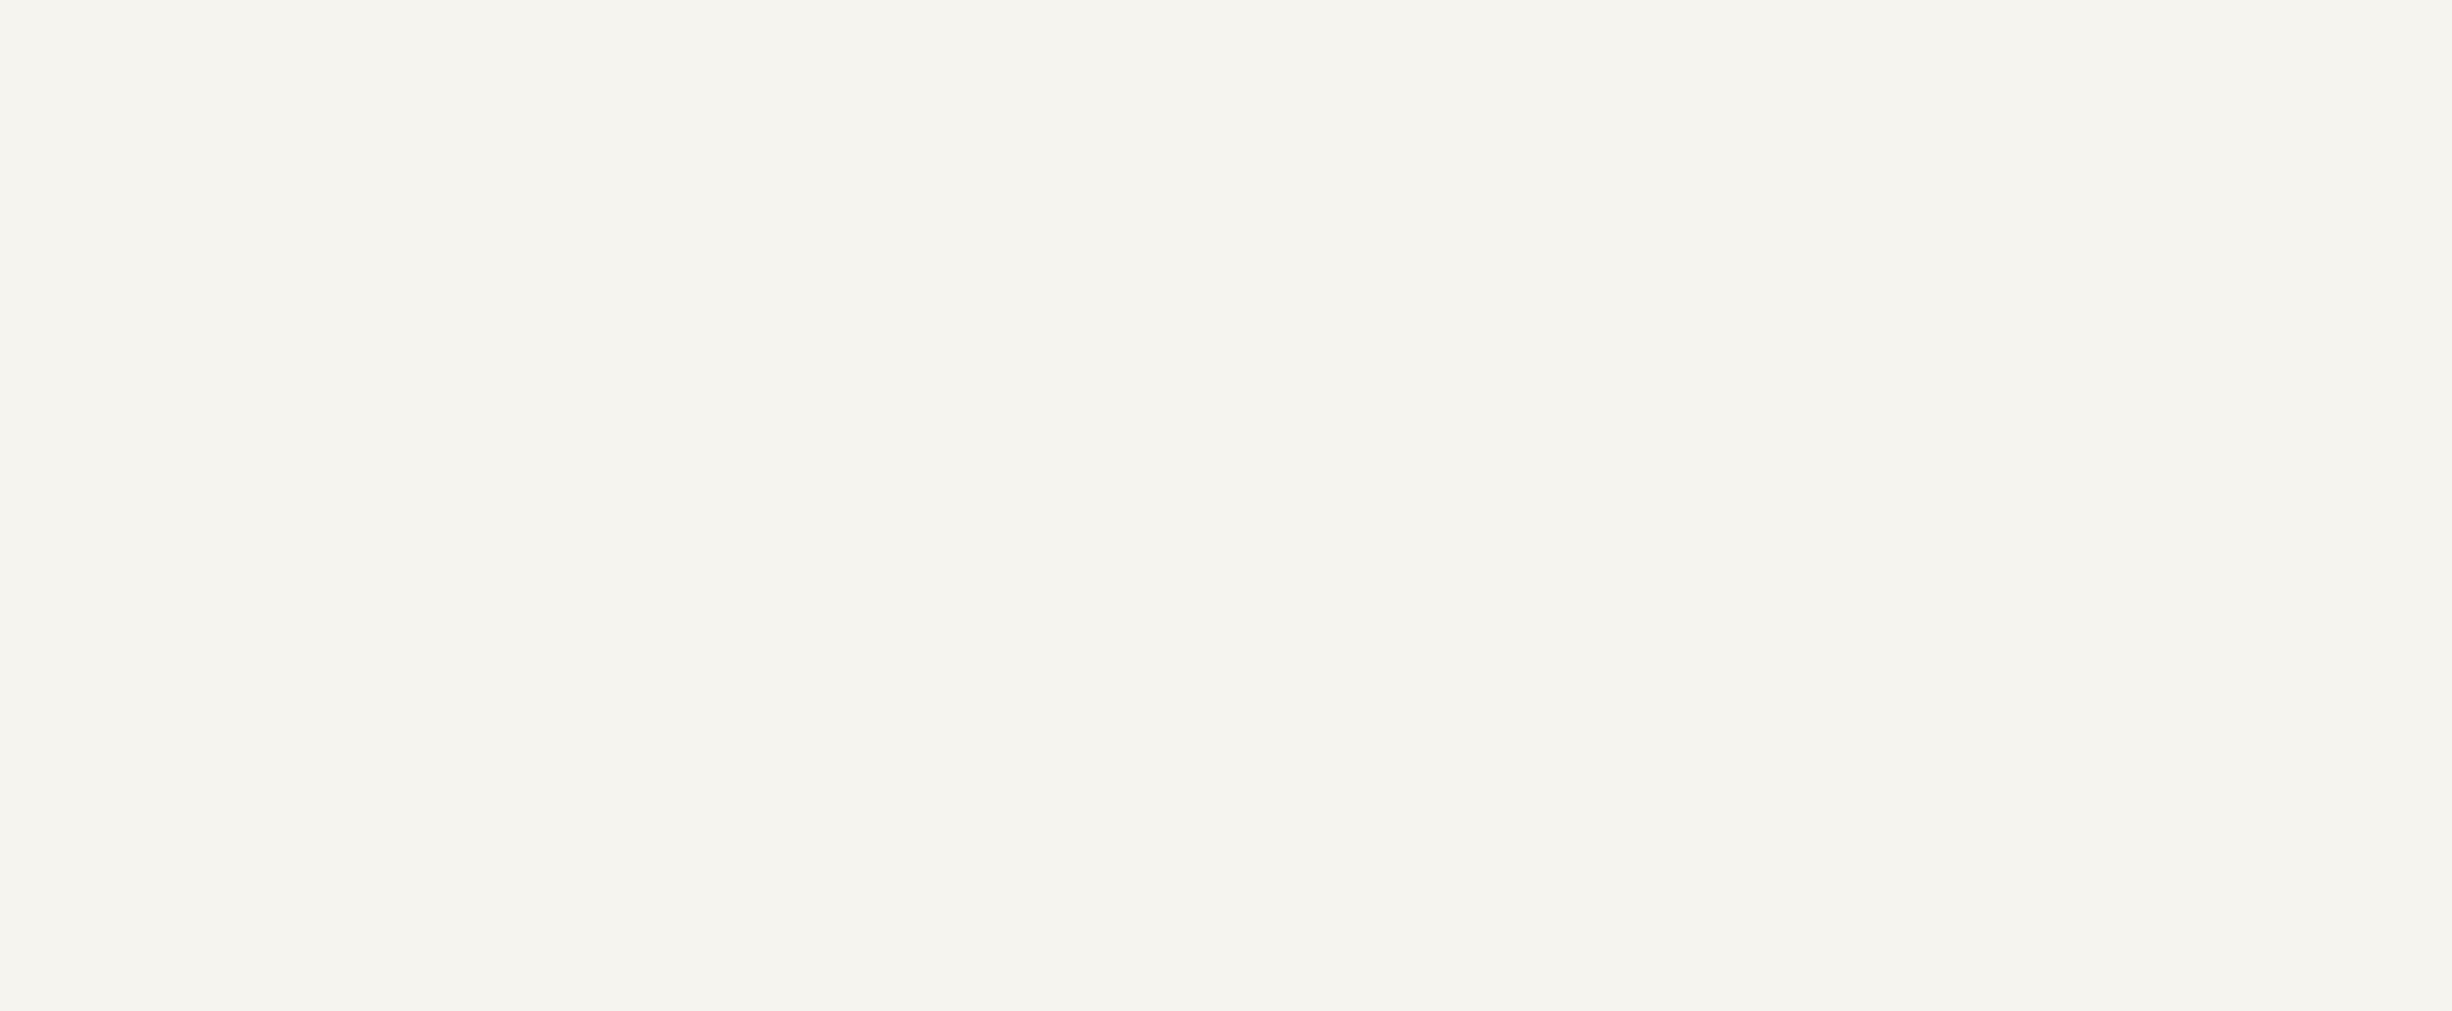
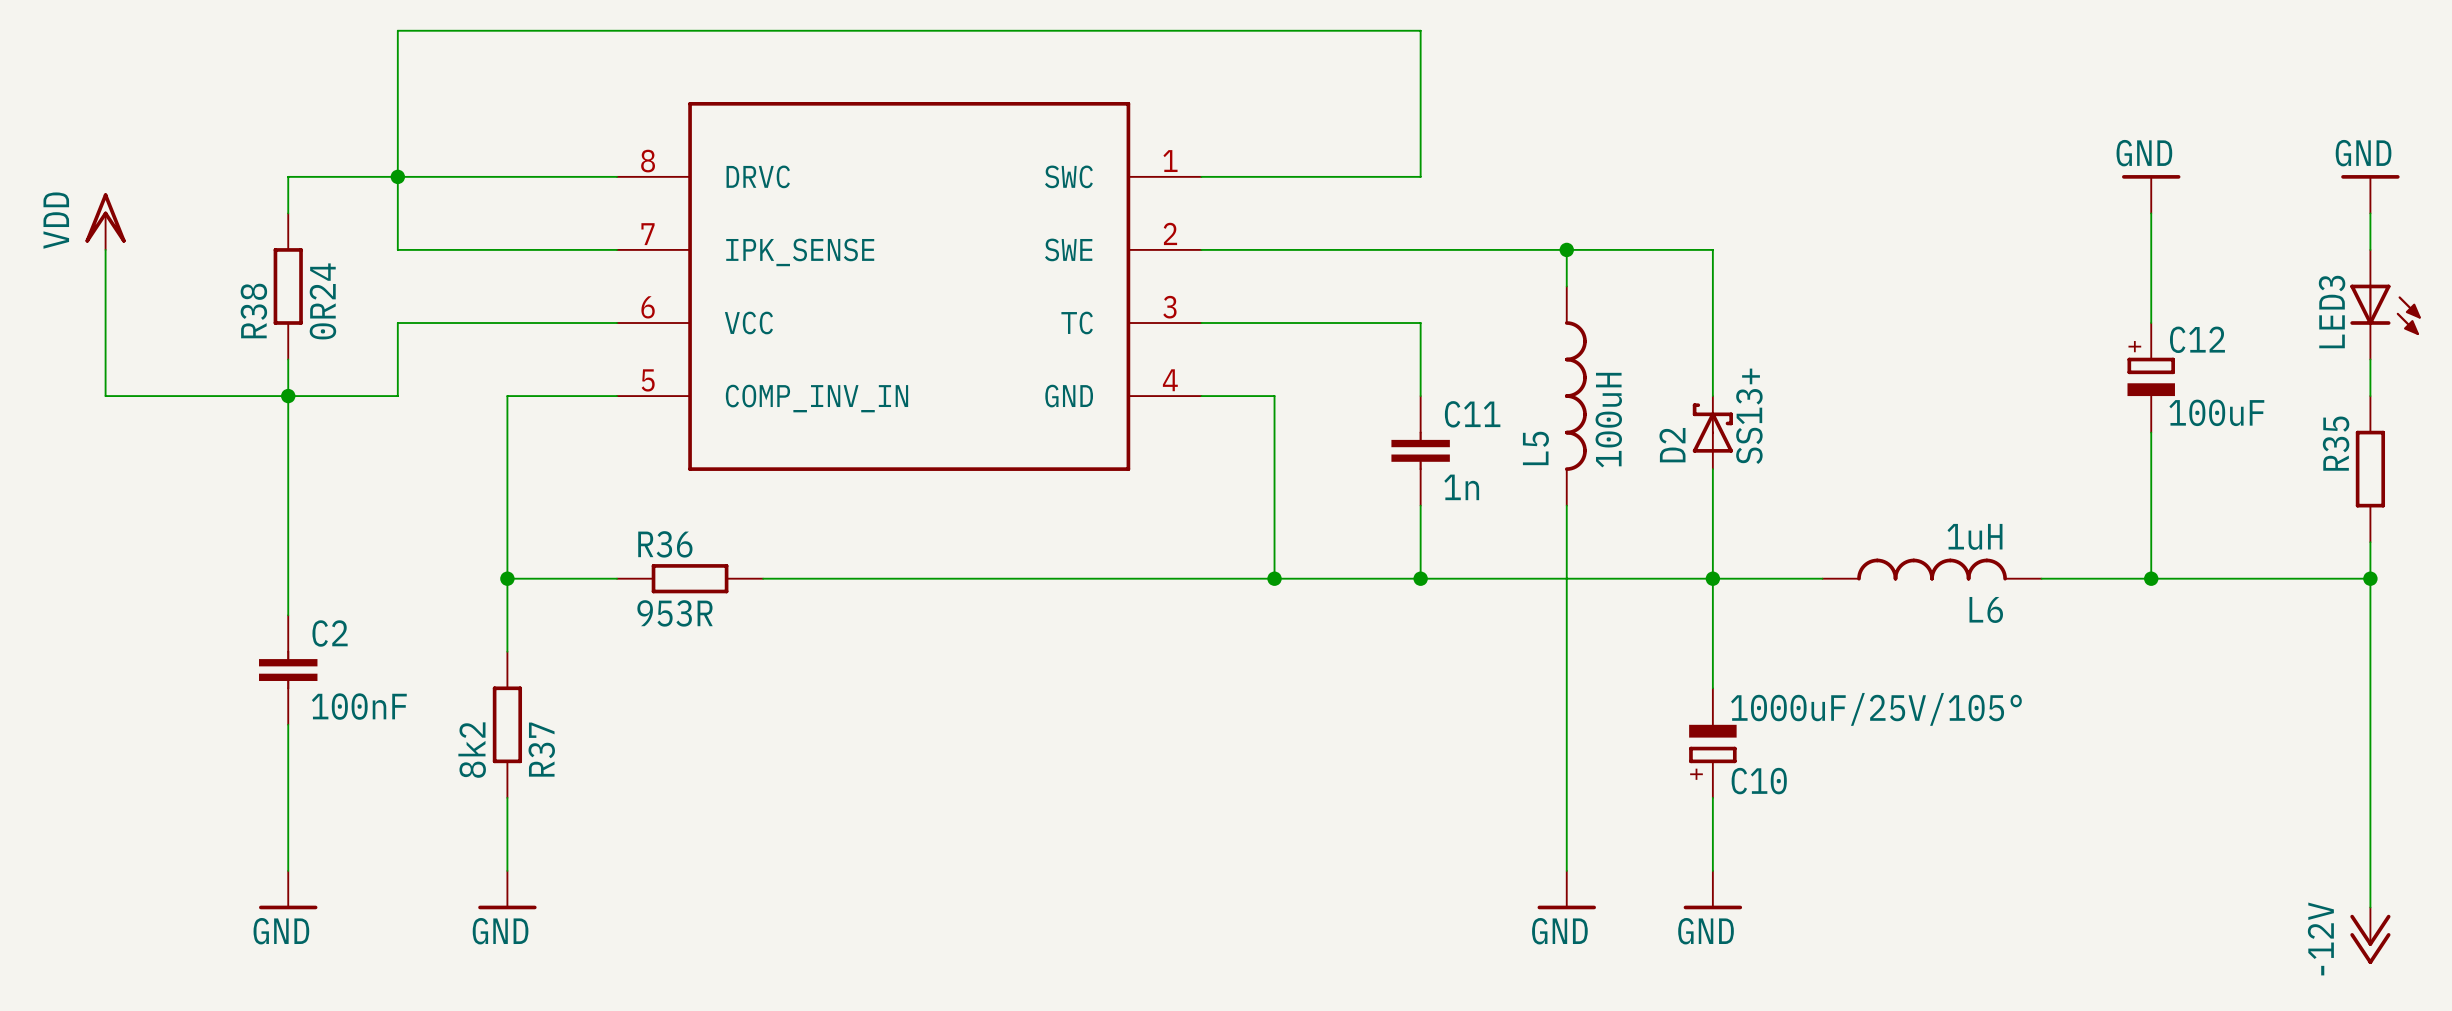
junction: none -> (397, 176)
wire: none -> (617, 176) (288, 176) (288, 213)
wire: none -> (1201, 176) (1420, 176) (1420, 30) (397, 30) (397, 249) (617, 249)
power symbol: none -> GND (2151, 194)
power symbol: none -> GND (2370, 194)
wire: none -> (2151, 213) (2151, 323)
wire: none -> (2370, 213) (2370, 249)
power symbol: none -> VDD (105, 221)
wire: none -> (105, 249) (105, 396) (397, 396) (397, 323) (617, 323)
wire: none -> (1201, 249) (1712, 249) (1712, 396)
wire: none -> (1566, 249) (1566, 286)
junction: none -> (1566, 249)
R38: none -> 0R24 (288, 286)
part: none -> (909, 286)
LED3: none -> (2385, 304)
wire: none -> (1201, 323) (1420, 323) (1420, 396)
wire: none -> (288, 359) (288, 615)
wire: none -> (2370, 359) (2370, 396)
C12: none -> 100uF (2151, 377)
junction: none -> (288, 396)
wire: none -> (617, 396) (507, 396) (507, 651)
wire: none -> (1201, 396) (1274, 396) (1274, 578)
L5: none -> 100uH (1575, 396)
D2: none -> SS13+ (1712, 432)
wire: none -> (2151, 432) (2151, 578)
C11: none -> 1n (1420, 450)
wire: none -> (1712, 469) (1712, 688)
R35: none -> (2370, 469)
wire: none -> (1420, 505) (1420, 578)
wire: none -> (1566, 505) (1566, 870)
wire: none -> (2370, 542) (2370, 907)
L6: none -> 1uH (1932, 569)
wire: none -> (507, 578) (617, 578)
junction: none -> (507, 578)
R36: none -> 953R (690, 578)
wire: none -> (763, 578) (1822, 578)
junction: none -> (1274, 578)
junction: none -> (1420, 578)
junction: none -> (1712, 578)
wire: none -> (2041, 578) (2370, 578)
junction: none -> (2151, 578)
junction: none -> (2370, 578)
C2: none -> 100nF (288, 670)
wire: none -> (288, 724) (288, 870)
R37: none -> 8k2 (507, 724)
C10: none -> 1000uF/25V/105° (1712, 743)
wire: none -> (507, 797) (507, 870)
wire: none -> (1712, 797) (1712, 870)
power symbol: none -> GND (288, 890)
power symbol: none -> GND (507, 890)
power symbol: none -> GND (1566, 890)
power symbol: none -> GND (1712, 890)
power symbol: none -> -12V (2370, 935)

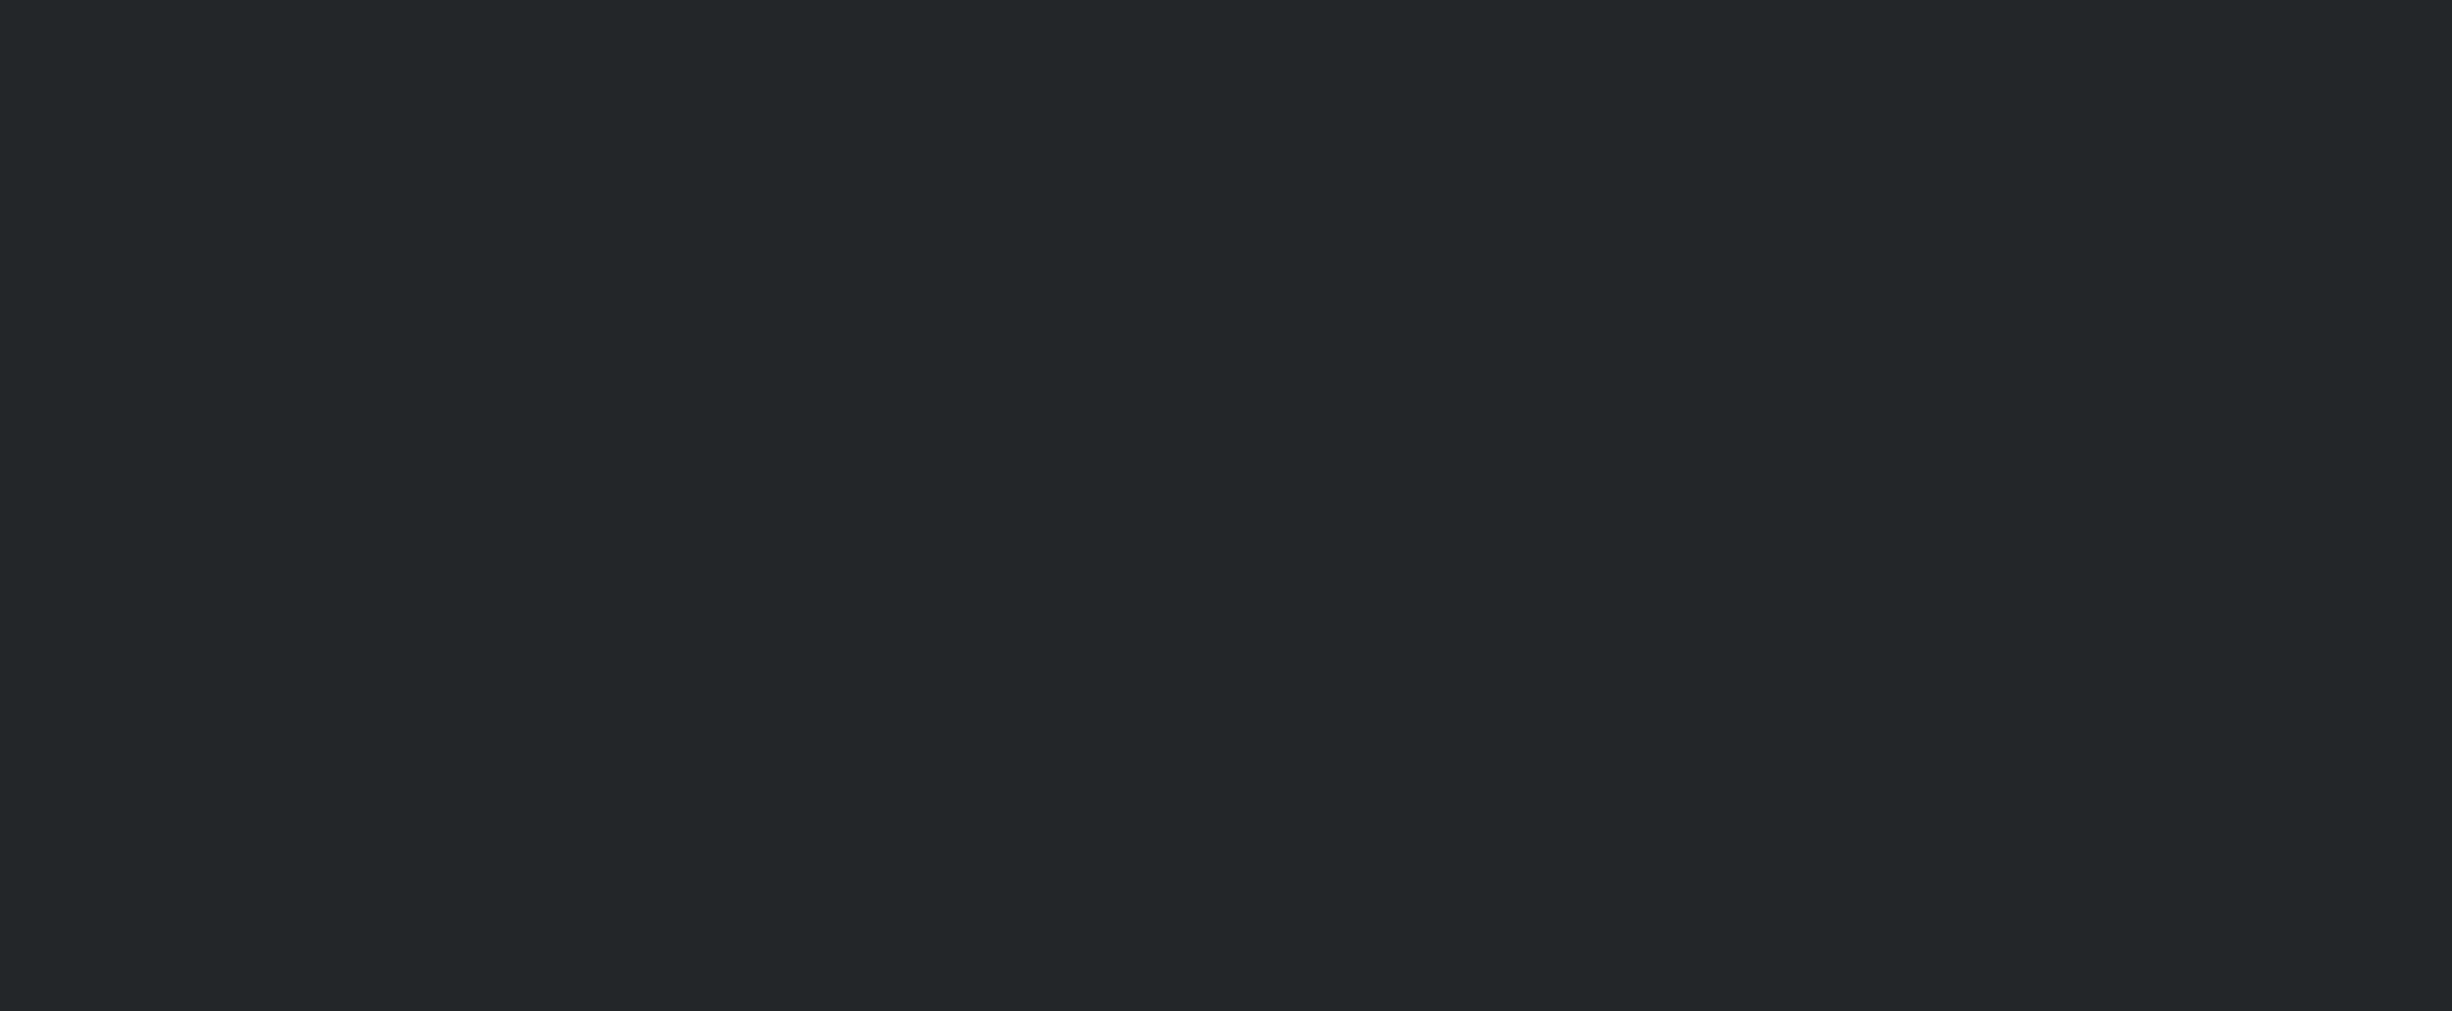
junction: (397, 176) -> none
wire: (617, 176) (288, 176) (288, 213) -> none
wire: (1201, 176) (1420, 176) (1420, 30) (397, 30) (397, 249) (617, 249) -> none
power symbol: GND (2151, 194) -> none
power symbol: GND (2370, 194) -> none
wire: (2151, 213) (2151, 323) -> none
wire: (2370, 213) (2370, 249) -> none
power symbol: VDD (105, 221) -> none
wire: (105, 249) (105, 396) (397, 396) (397, 323) (617, 323) -> none
wire: (1201, 249) (1712, 249) (1712, 396) -> none
wire: (1566, 249) (1566, 286) -> none
junction: (1566, 249) -> none
R38: 0R24 (288, 286) -> none
part: (909, 286) -> none
LED3: (2385, 304) -> none
wire: (1201, 323) (1420, 323) (1420, 396) -> none
wire: (288, 359) (288, 615) -> none
wire: (2370, 359) (2370, 396) -> none
C12: 100uF (2151, 377) -> none
junction: (288, 396) -> none
wire: (617, 396) (507, 396) (507, 651) -> none
wire: (1201, 396) (1274, 396) (1274, 578) -> none
L5: 100uH (1575, 396) -> none
D2: SS13+ (1712, 432) -> none
wire: (2151, 432) (2151, 578) -> none
C11: 1n (1420, 450) -> none
wire: (1712, 469) (1712, 688) -> none
R35: (2370, 469) -> none
wire: (1420, 505) (1420, 578) -> none
wire: (1566, 505) (1566, 870) -> none
wire: (2370, 542) (2370, 907) -> none
L6: 1uH (1932, 569) -> none
wire: (507, 578) (617, 578) -> none
junction: (507, 578) -> none
R36: 953R (690, 578) -> none
wire: (763, 578) (1822, 578) -> none
junction: (1274, 578) -> none
junction: (1420, 578) -> none
junction: (1712, 578) -> none
wire: (2041, 578) (2370, 578) -> none
junction: (2151, 578) -> none
junction: (2370, 578) -> none
C2: 100nF (288, 670) -> none
wire: (288, 724) (288, 870) -> none
R37: 8k2 (507, 724) -> none
C10: 1000uF/25V/105° (1712, 743) -> none
wire: (507, 797) (507, 870) -> none
wire: (1712, 797) (1712, 870) -> none
power symbol: GND (288, 890) -> none
power symbol: GND (507, 890) -> none
power symbol: GND (1566, 890) -> none
power symbol: GND (1712, 890) -> none
power symbol: -12V (2370, 935) -> none

